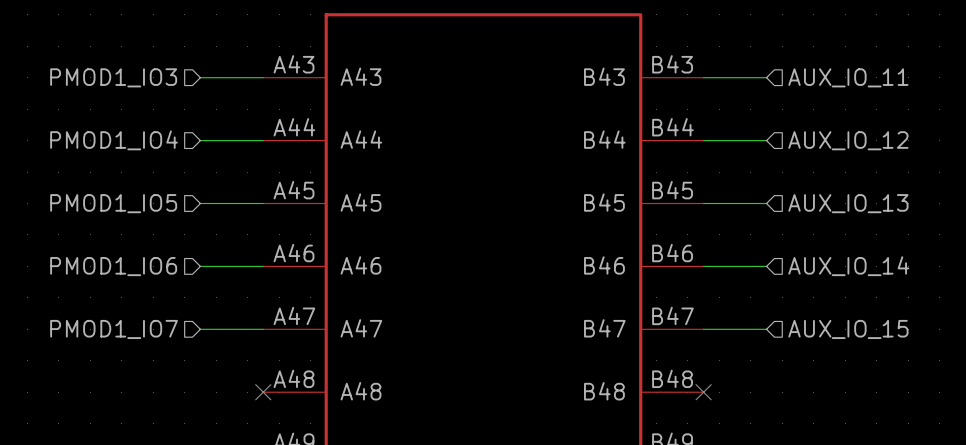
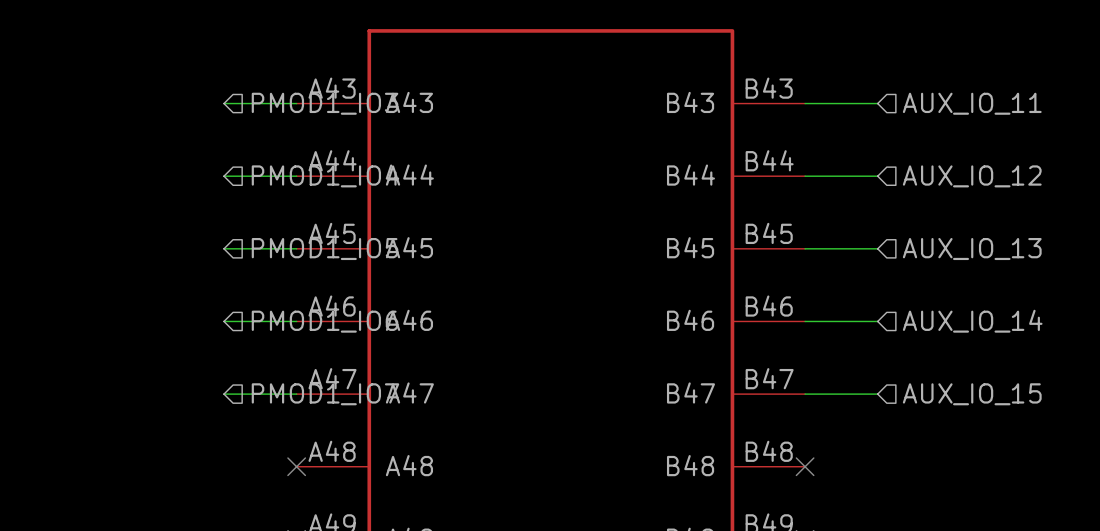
hierarchical label rotation: 0° (113, 77) -> 180° (325, 103)
hierarchical label position: PMOD1_IO3 (113, 77) -> PMOD1_IO3 (325, 103)
hierarchical label rotation: 0° (114, 140) -> 180° (325, 175)
hierarchical label position: PMOD1_IO4 (114, 140) -> PMOD1_IO4 (325, 175)
hierarchical label rotation: 0° (113, 203) -> 180° (325, 249)
hierarchical label position: PMOD1_IO5 (113, 203) -> PMOD1_IO5 (325, 249)
hierarchical label rotation: 0° (113, 266) -> 180° (325, 321)
hierarchical label position: PMOD1_IO6 (113, 266) -> PMOD1_IO6 (325, 321)
hierarchical label rotation: 0° (114, 329) -> 180° (325, 394)
hierarchical label position: PMOD1_IO7 (114, 329) -> PMOD1_IO7 (325, 394)

